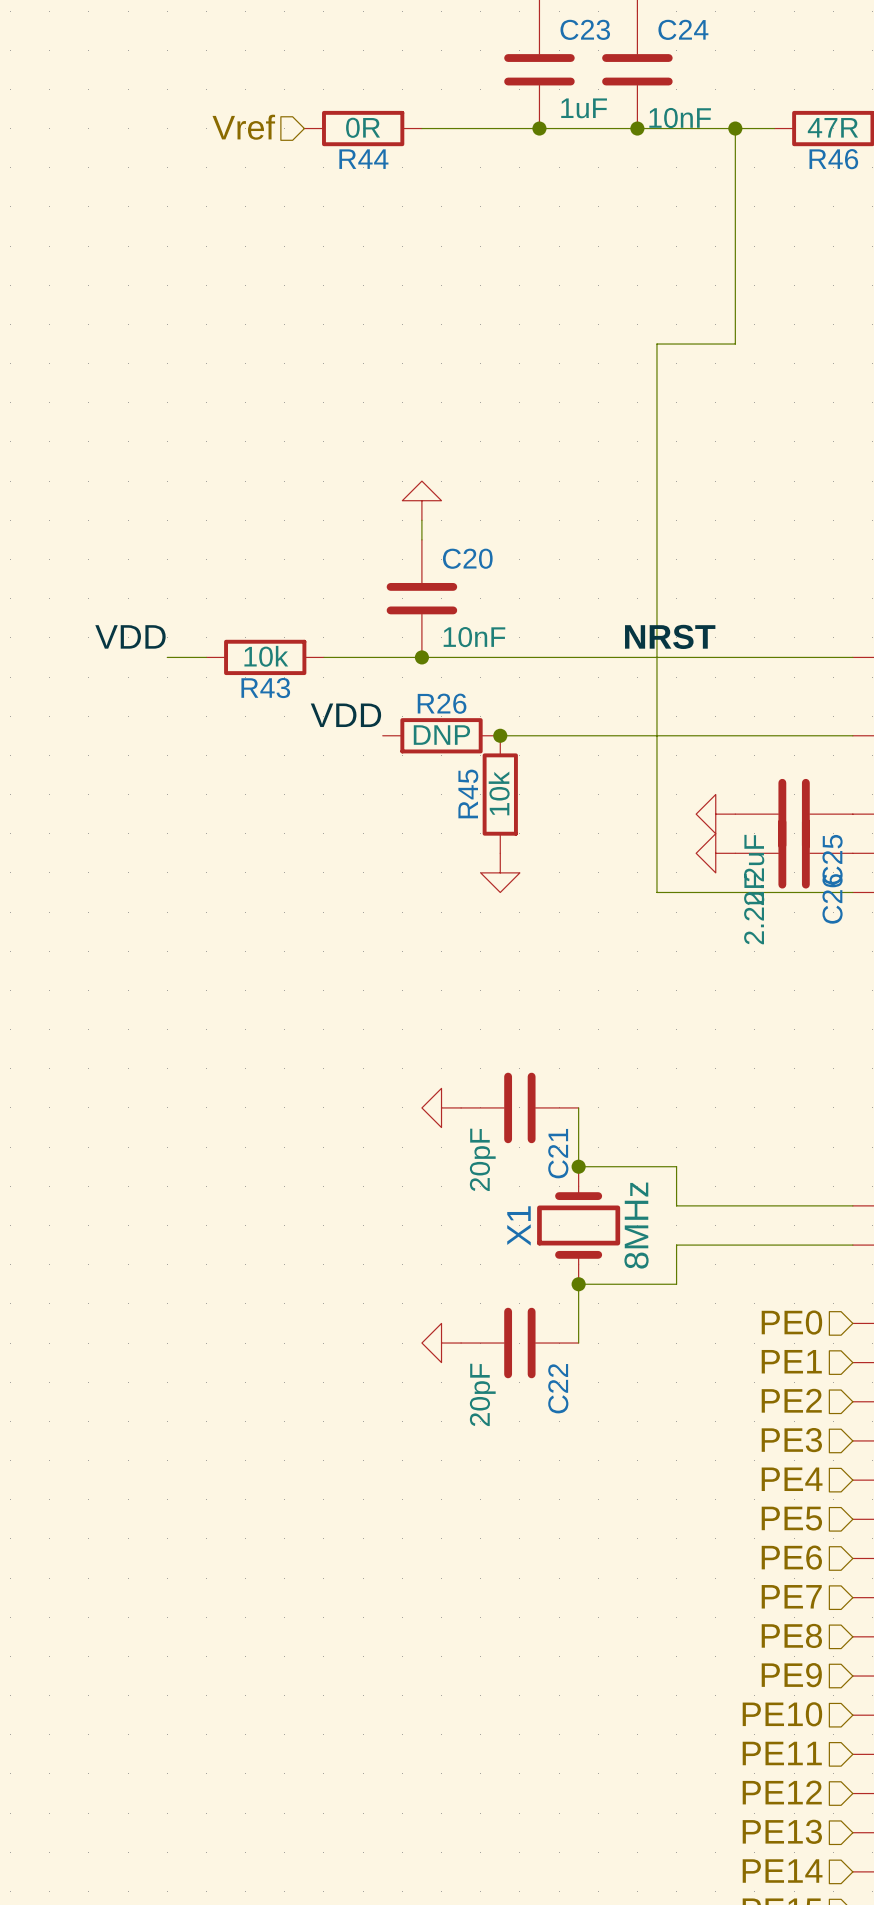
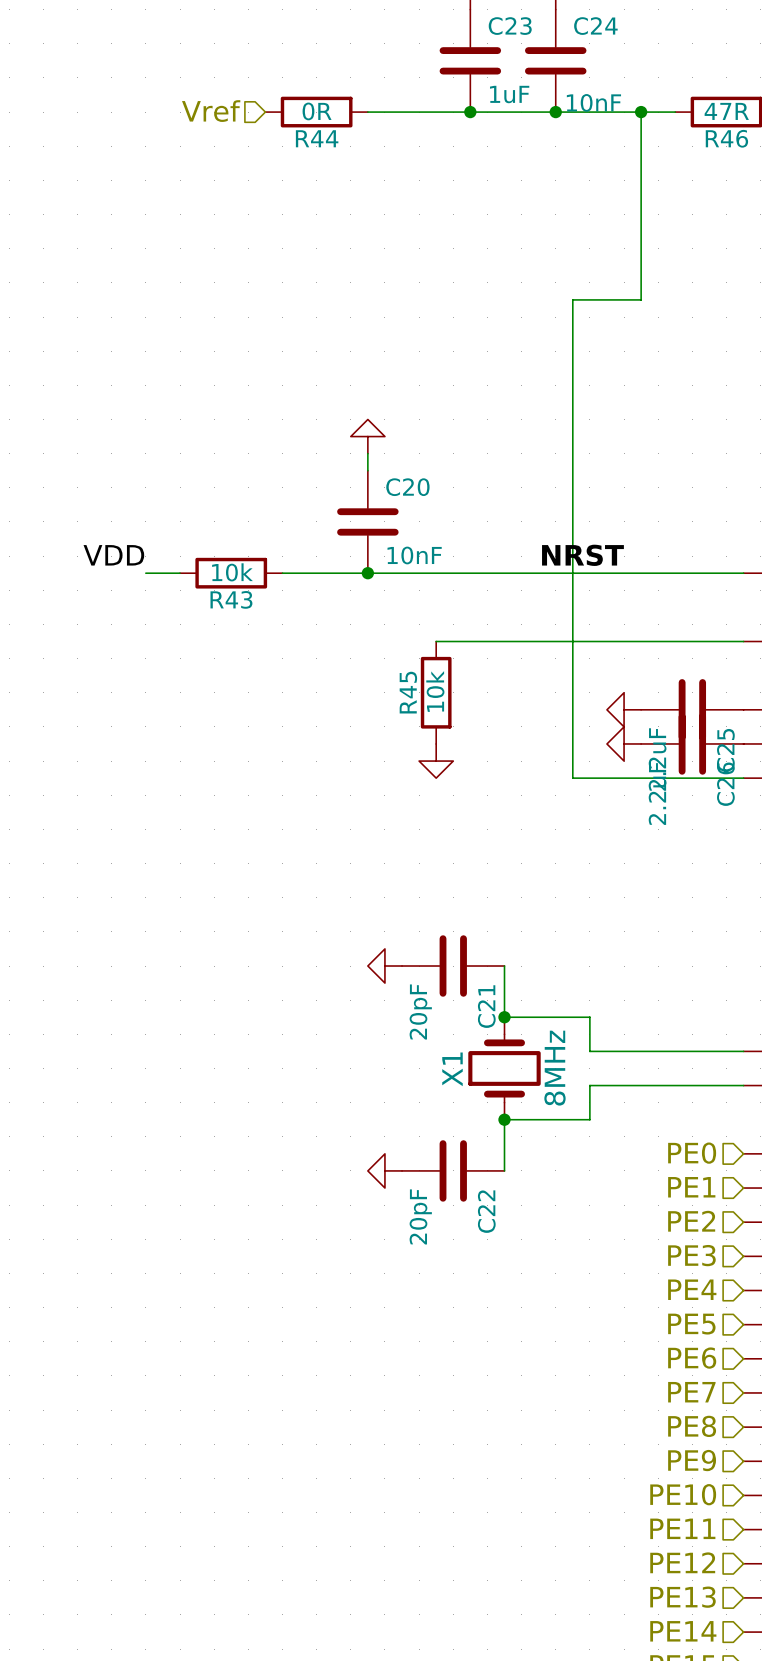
label: VDD (345, 715) -> none
R26: DNP (441, 735) -> none
junction: (500, 735) -> none

